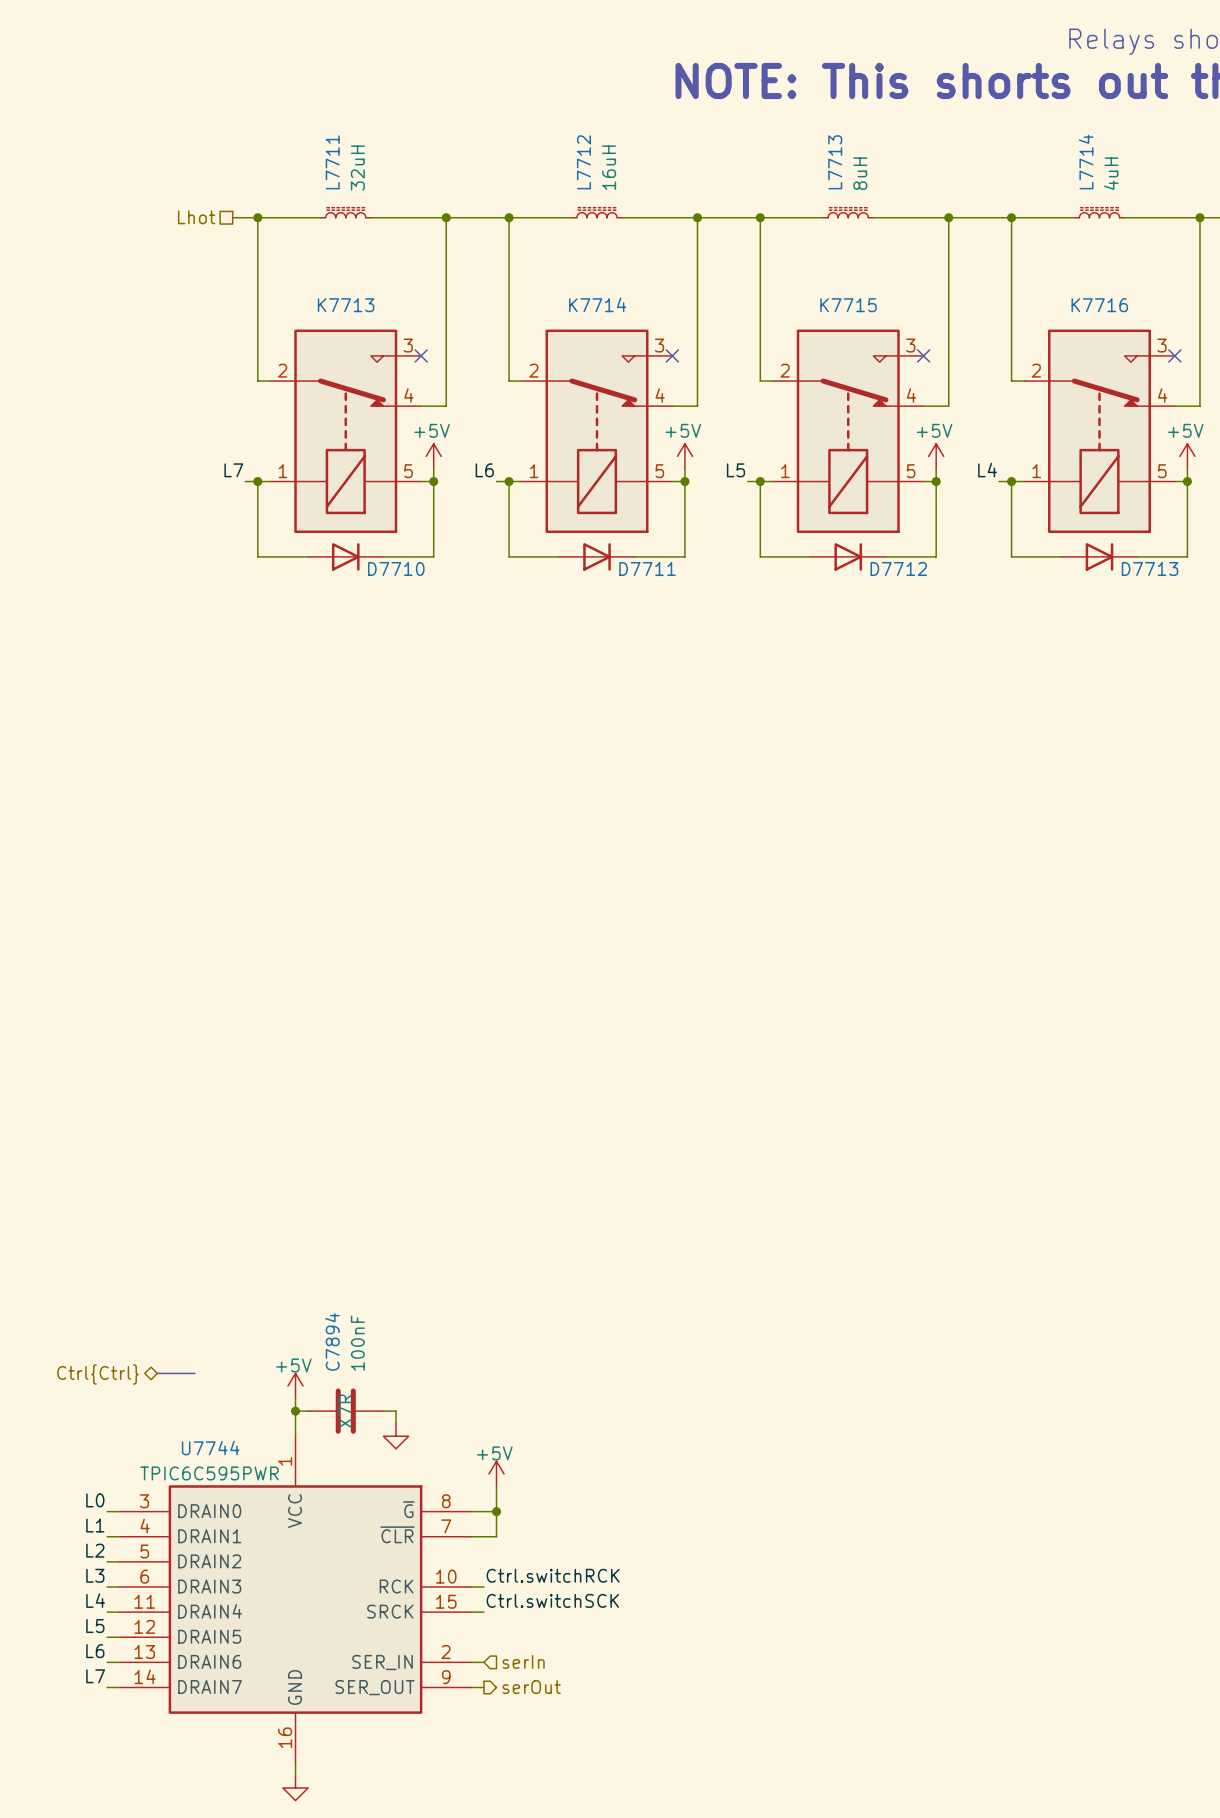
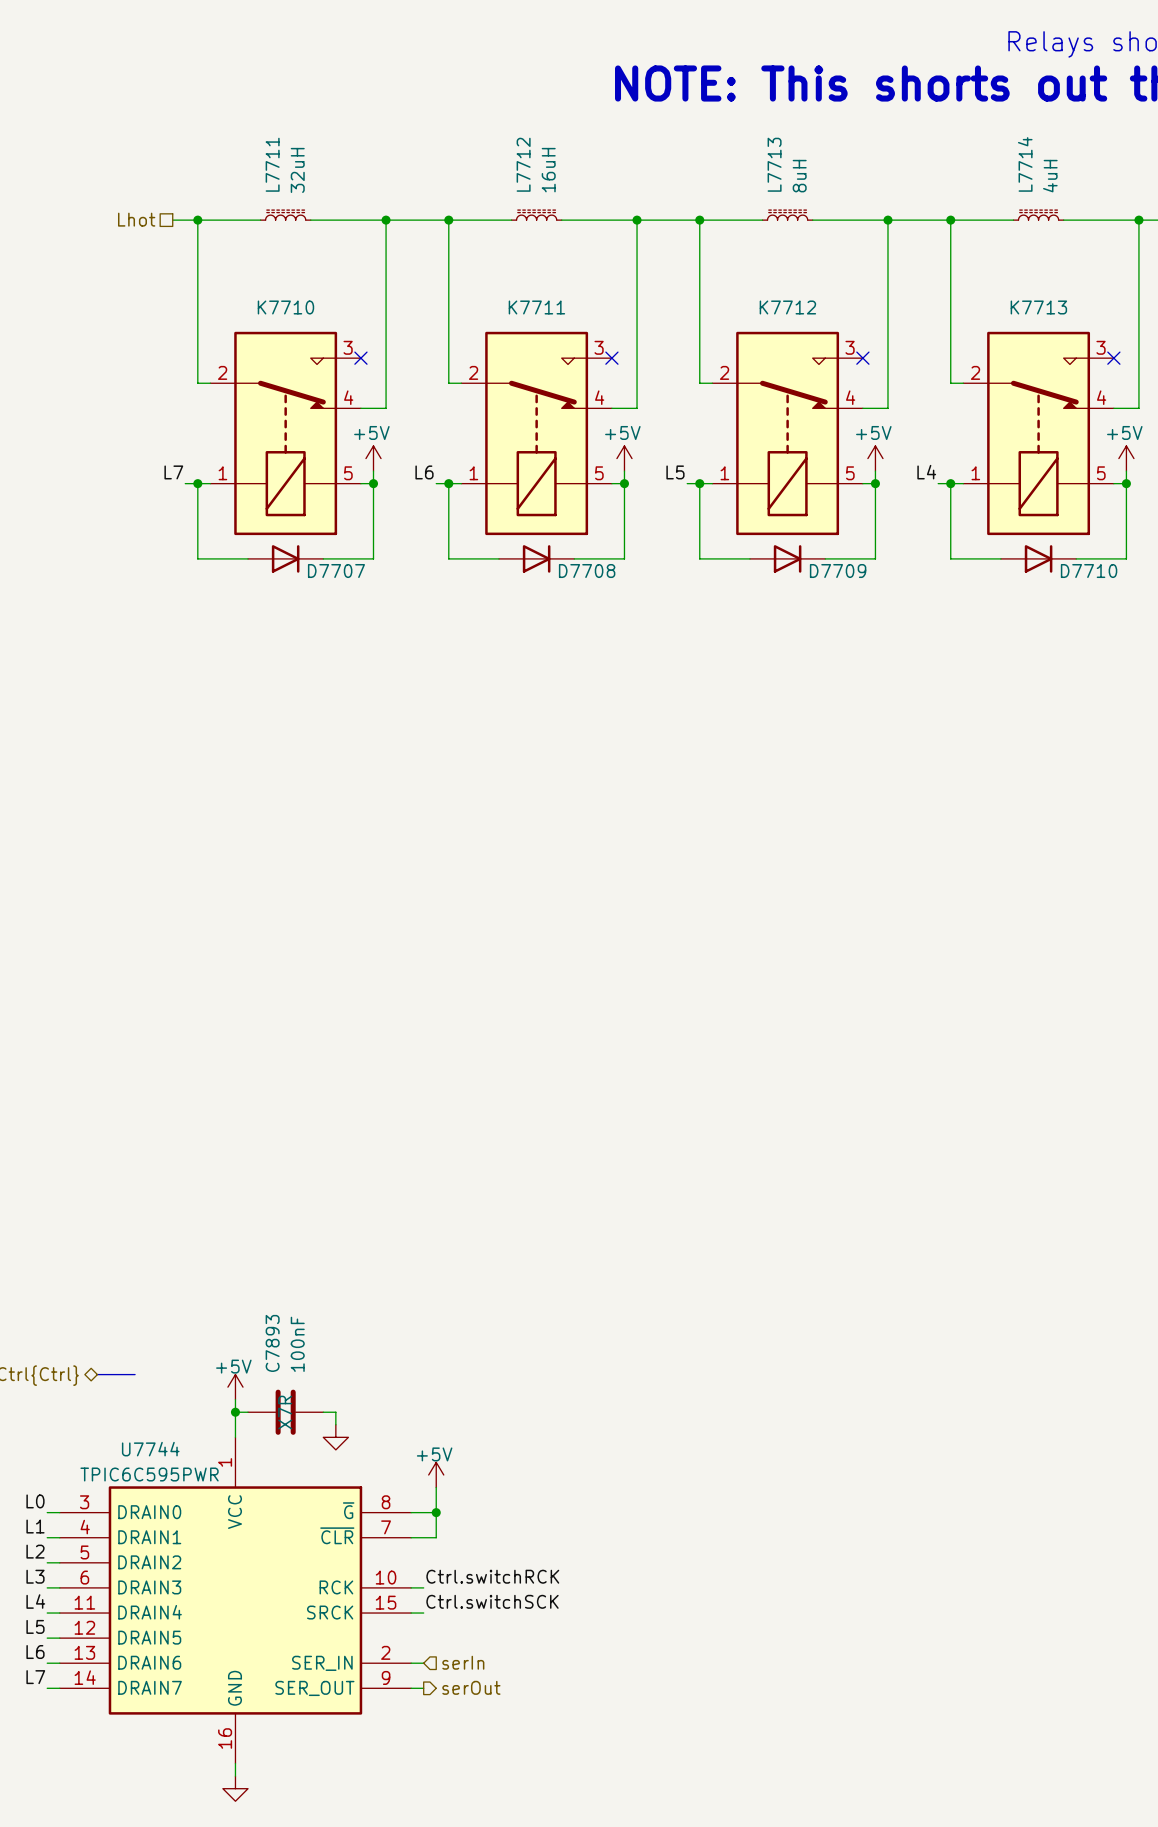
K7714 name: K7714 (597, 304) -> K7711 (536, 307)
K7713 name: K7713 (346, 305) -> K7710 (285, 307)
K7715 name: K7715 (848, 305) -> K7712 (787, 307)
K7716 name: K7716 (1099, 305) -> K7713 (1038, 307)
D7710 name: D7710 (396, 569) -> D7707 (336, 571)
D7711 name: D7711 (647, 569) -> D7708 (587, 571)
D7712 name: D7712 (898, 569) -> D7709 (838, 571)
D7713 name: D7713 (1150, 569) -> D7710 (1089, 571)
C7894 name: C7894 (332, 1341) -> C7893 (272, 1343)

